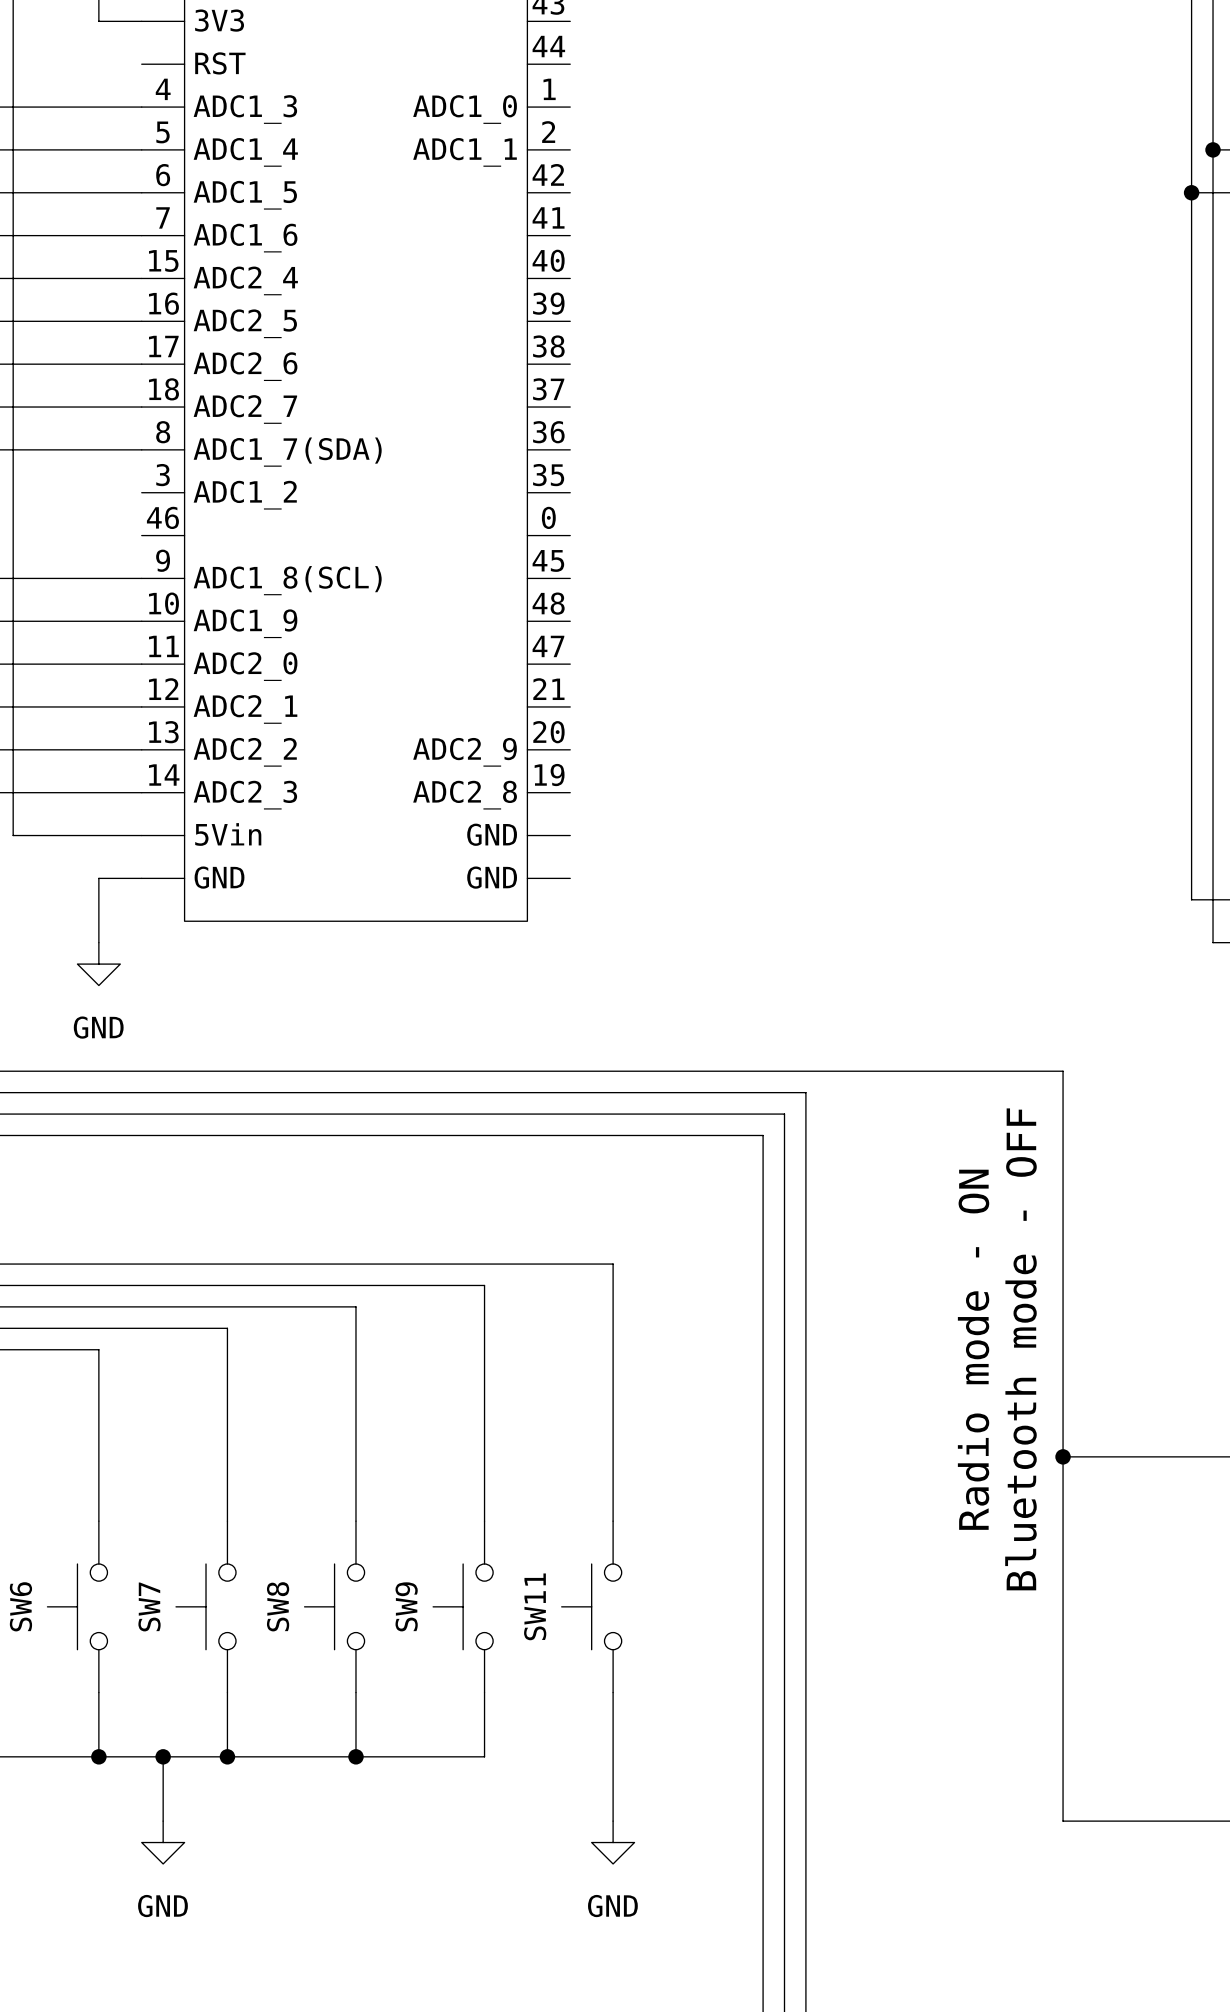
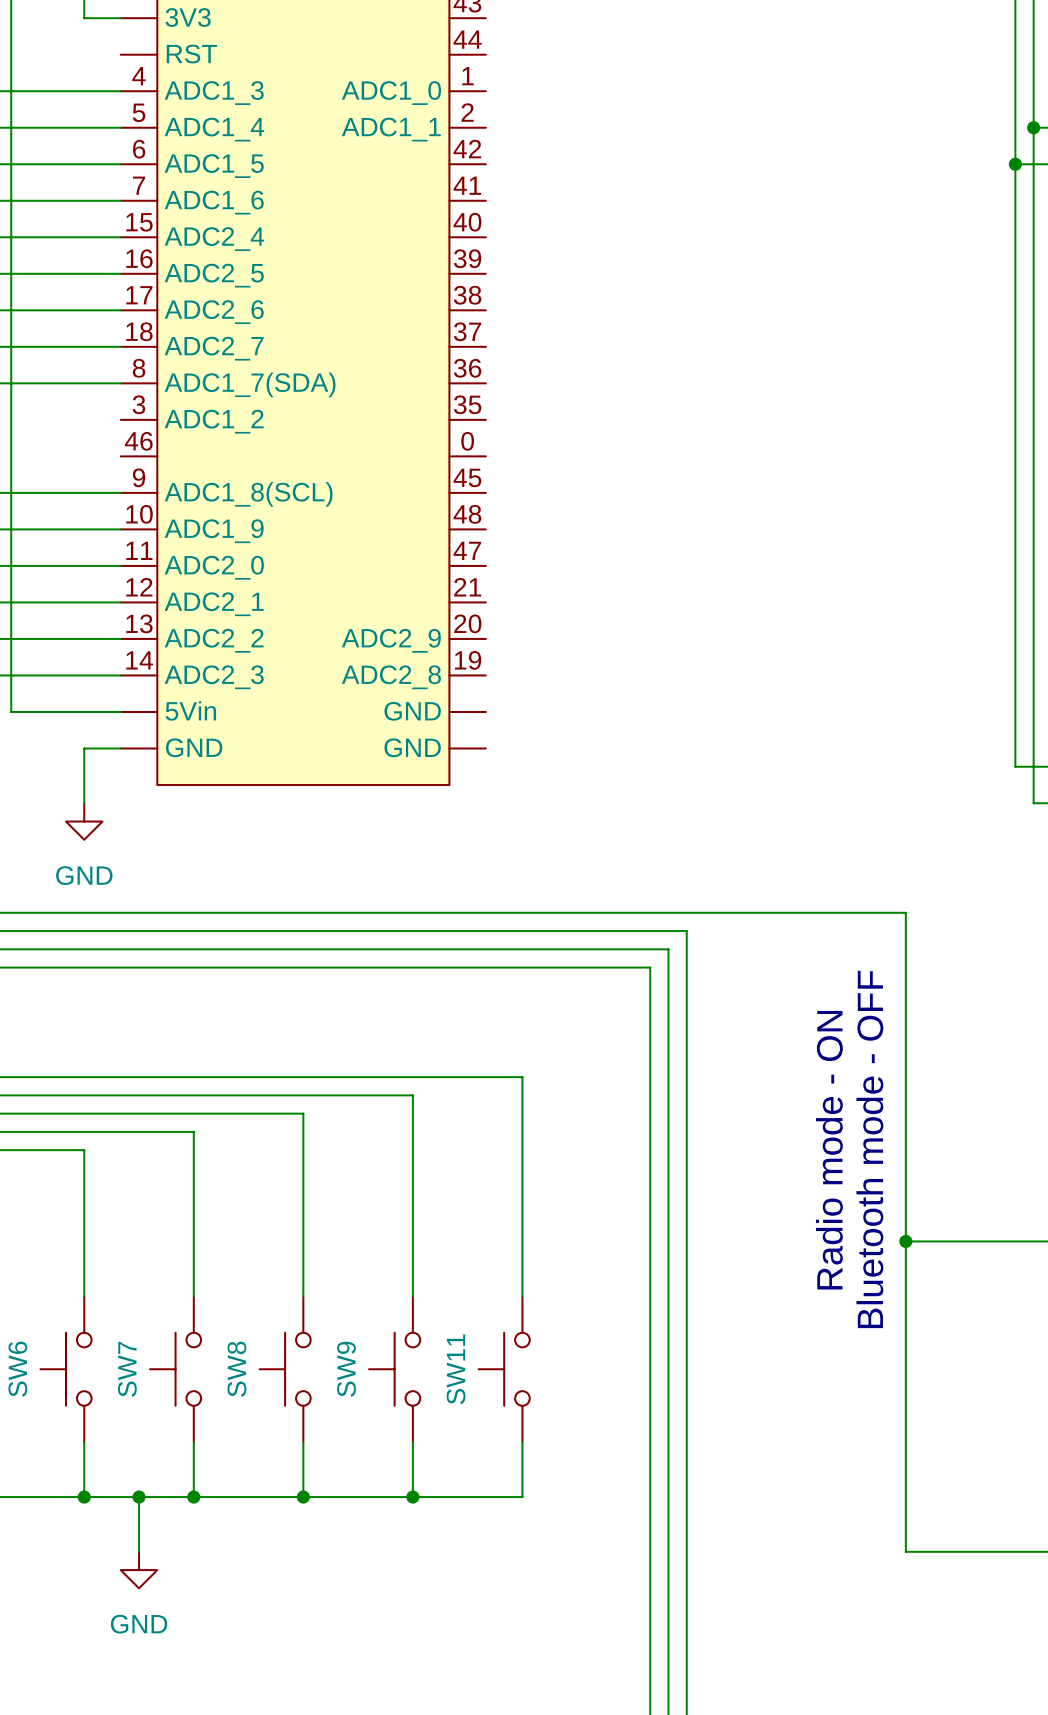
junction: none -> (412, 1497)
wire: (613, 1756) (613, 1821) -> (522, 1497) (412, 1497)
power symbol: GND (613, 1842) -> none

